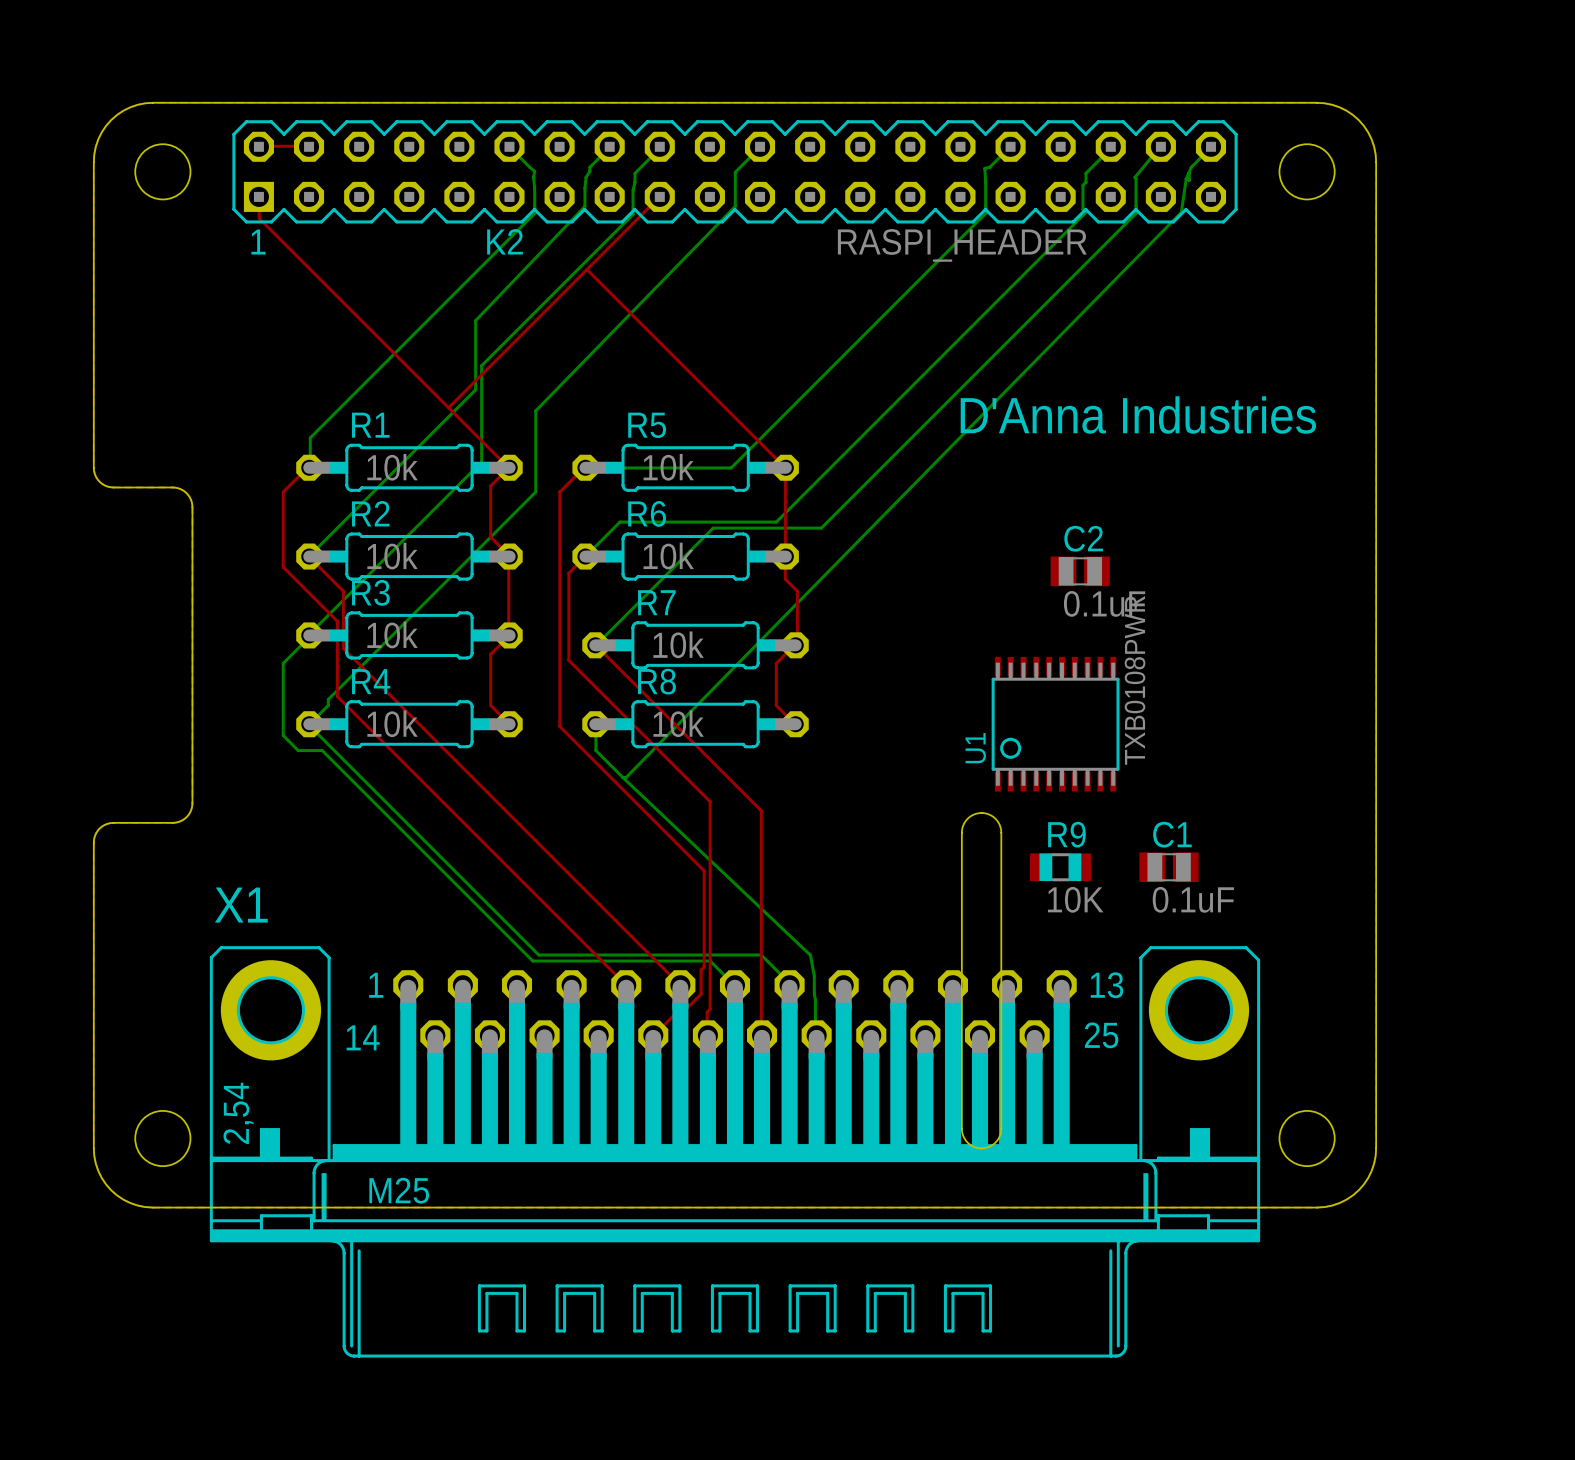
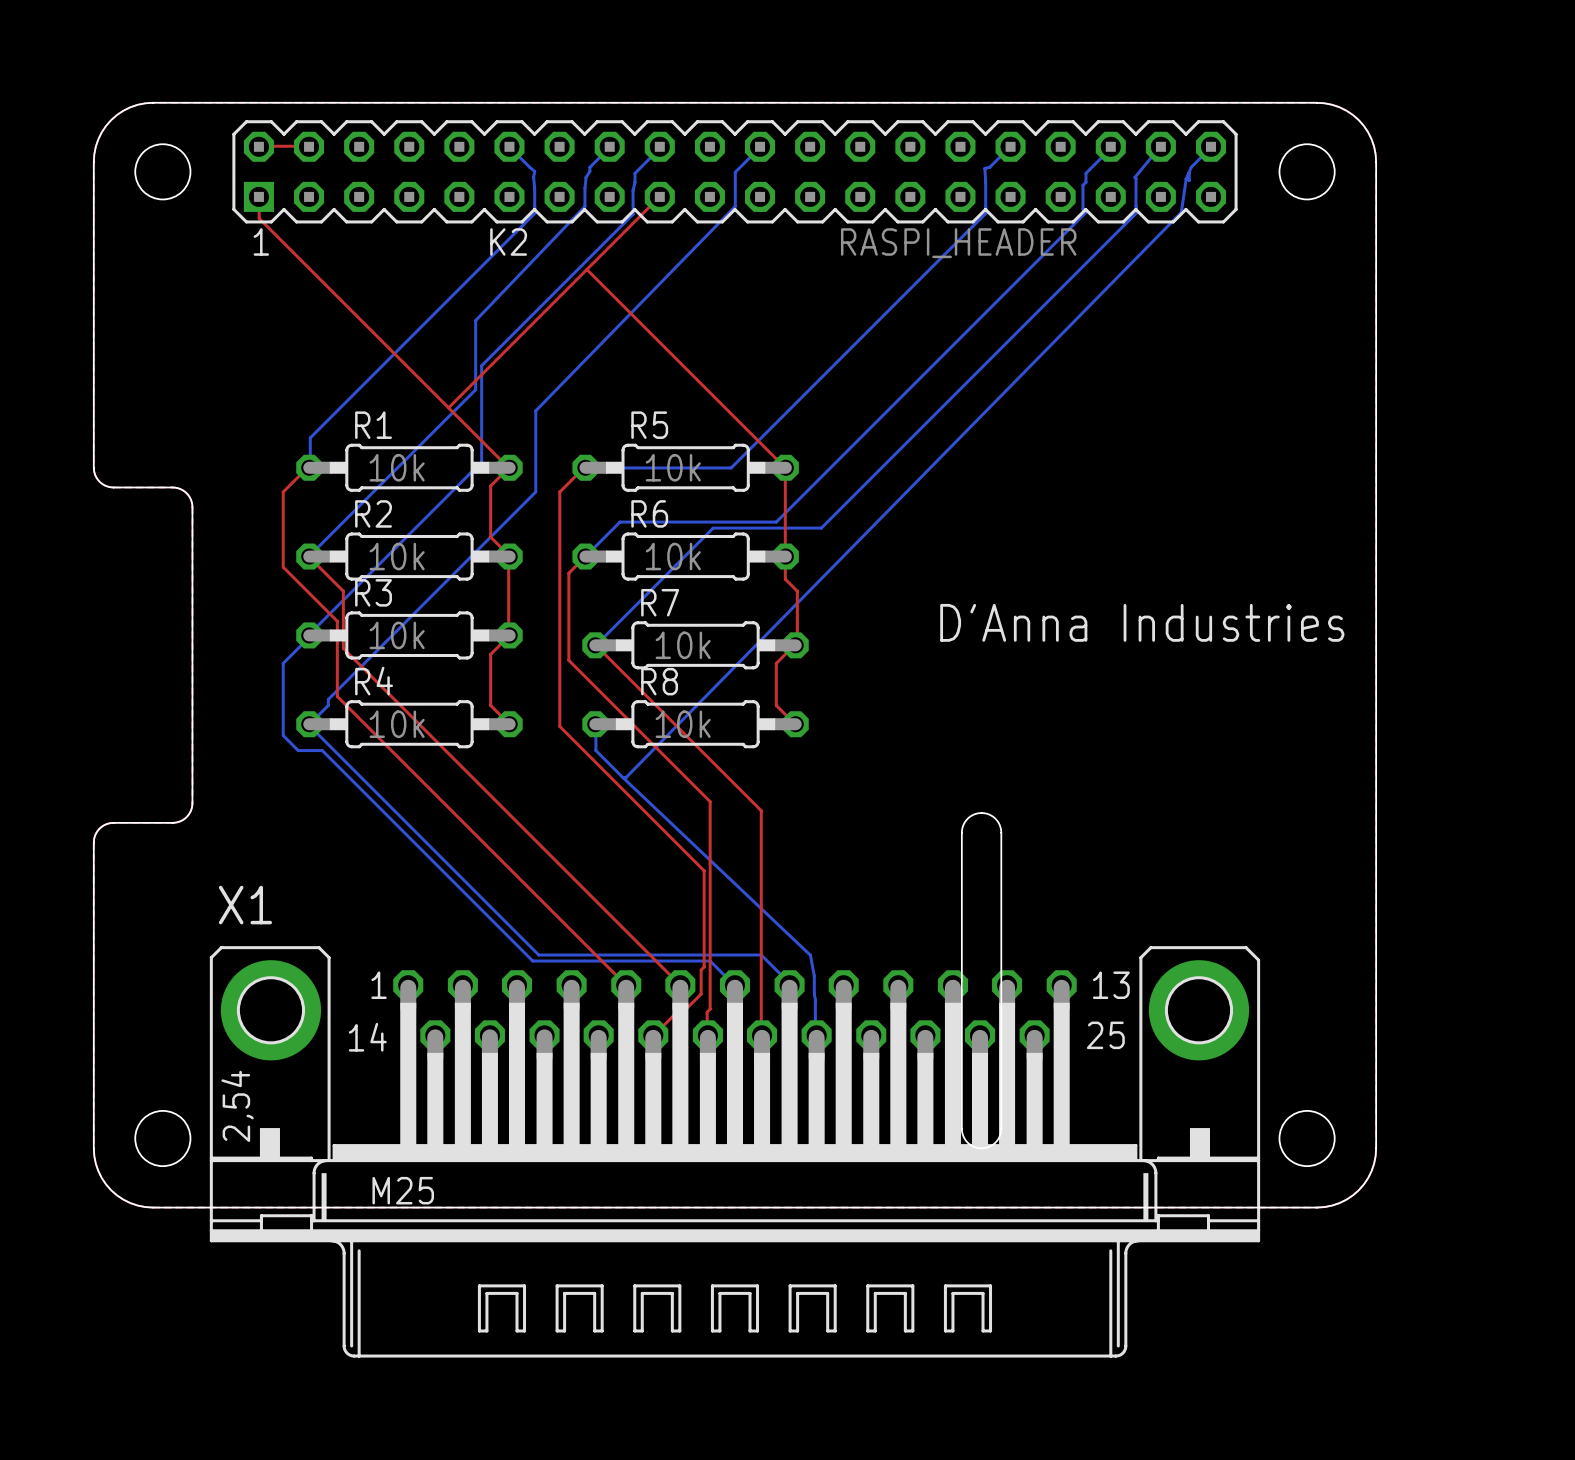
text position: D'Anna Industries (1138, 415) -> D'Anna Industries (1142, 622)
C2: 0.1uF (1080, 571) -> none
U1: TXB0108PWR (1055, 724) -> none
R9: 10K (1060, 867) -> none
C1: 0.1uF (1168, 867) -> none

